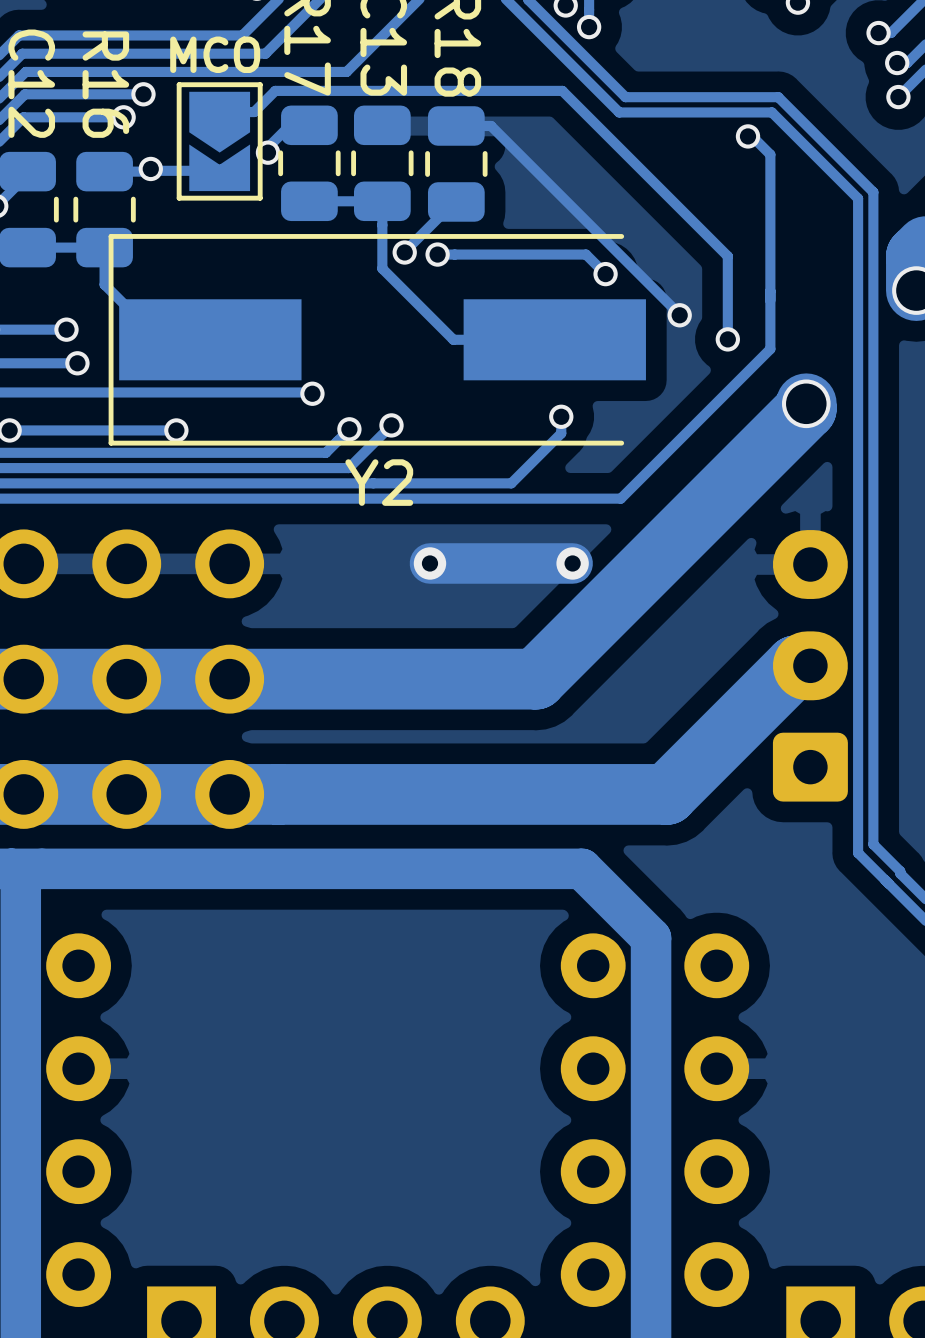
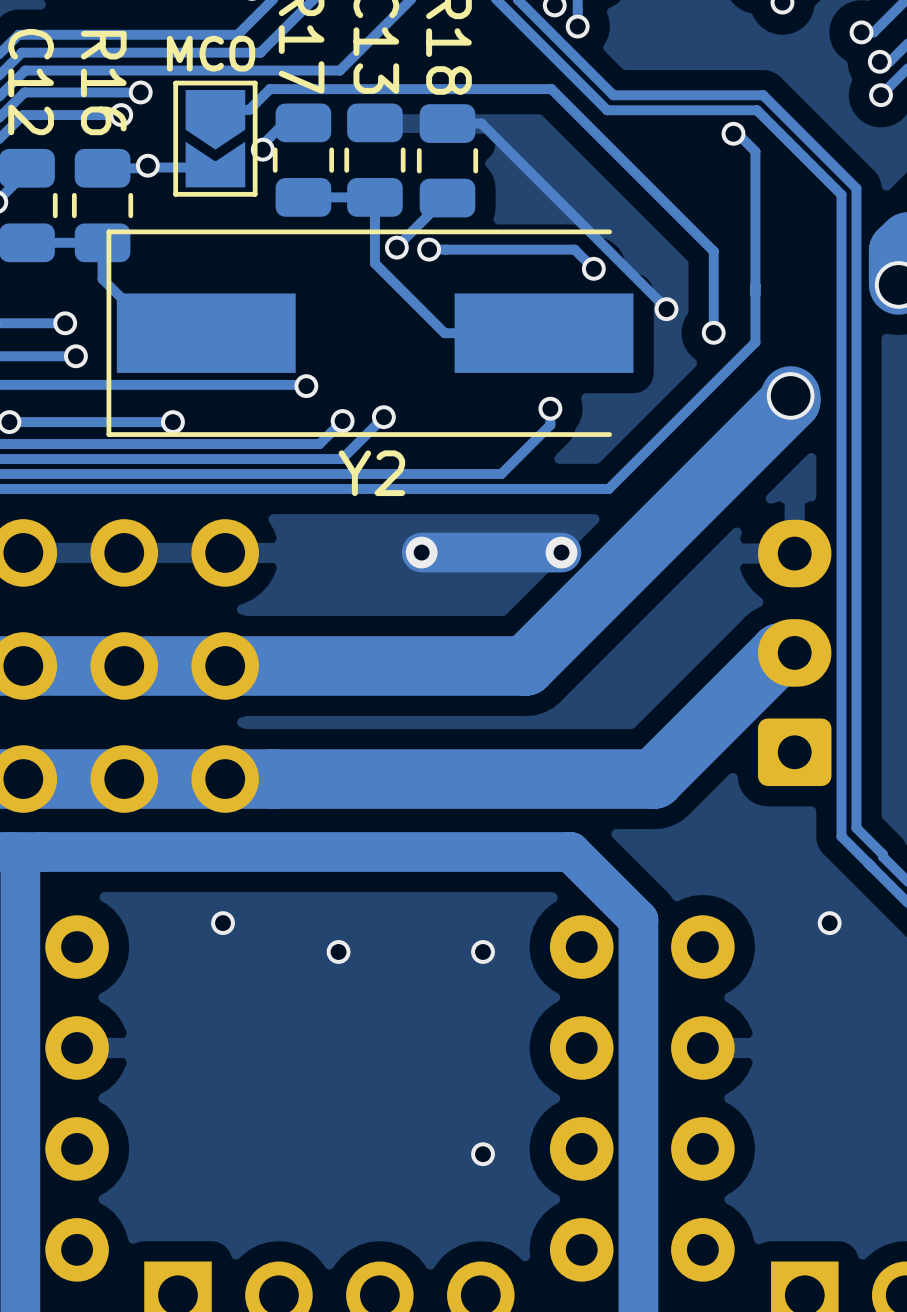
via: none -> (223, 923)
via: none -> (829, 923)
via: none -> (338, 951)
via: none -> (483, 951)
via: none -> (483, 1154)

